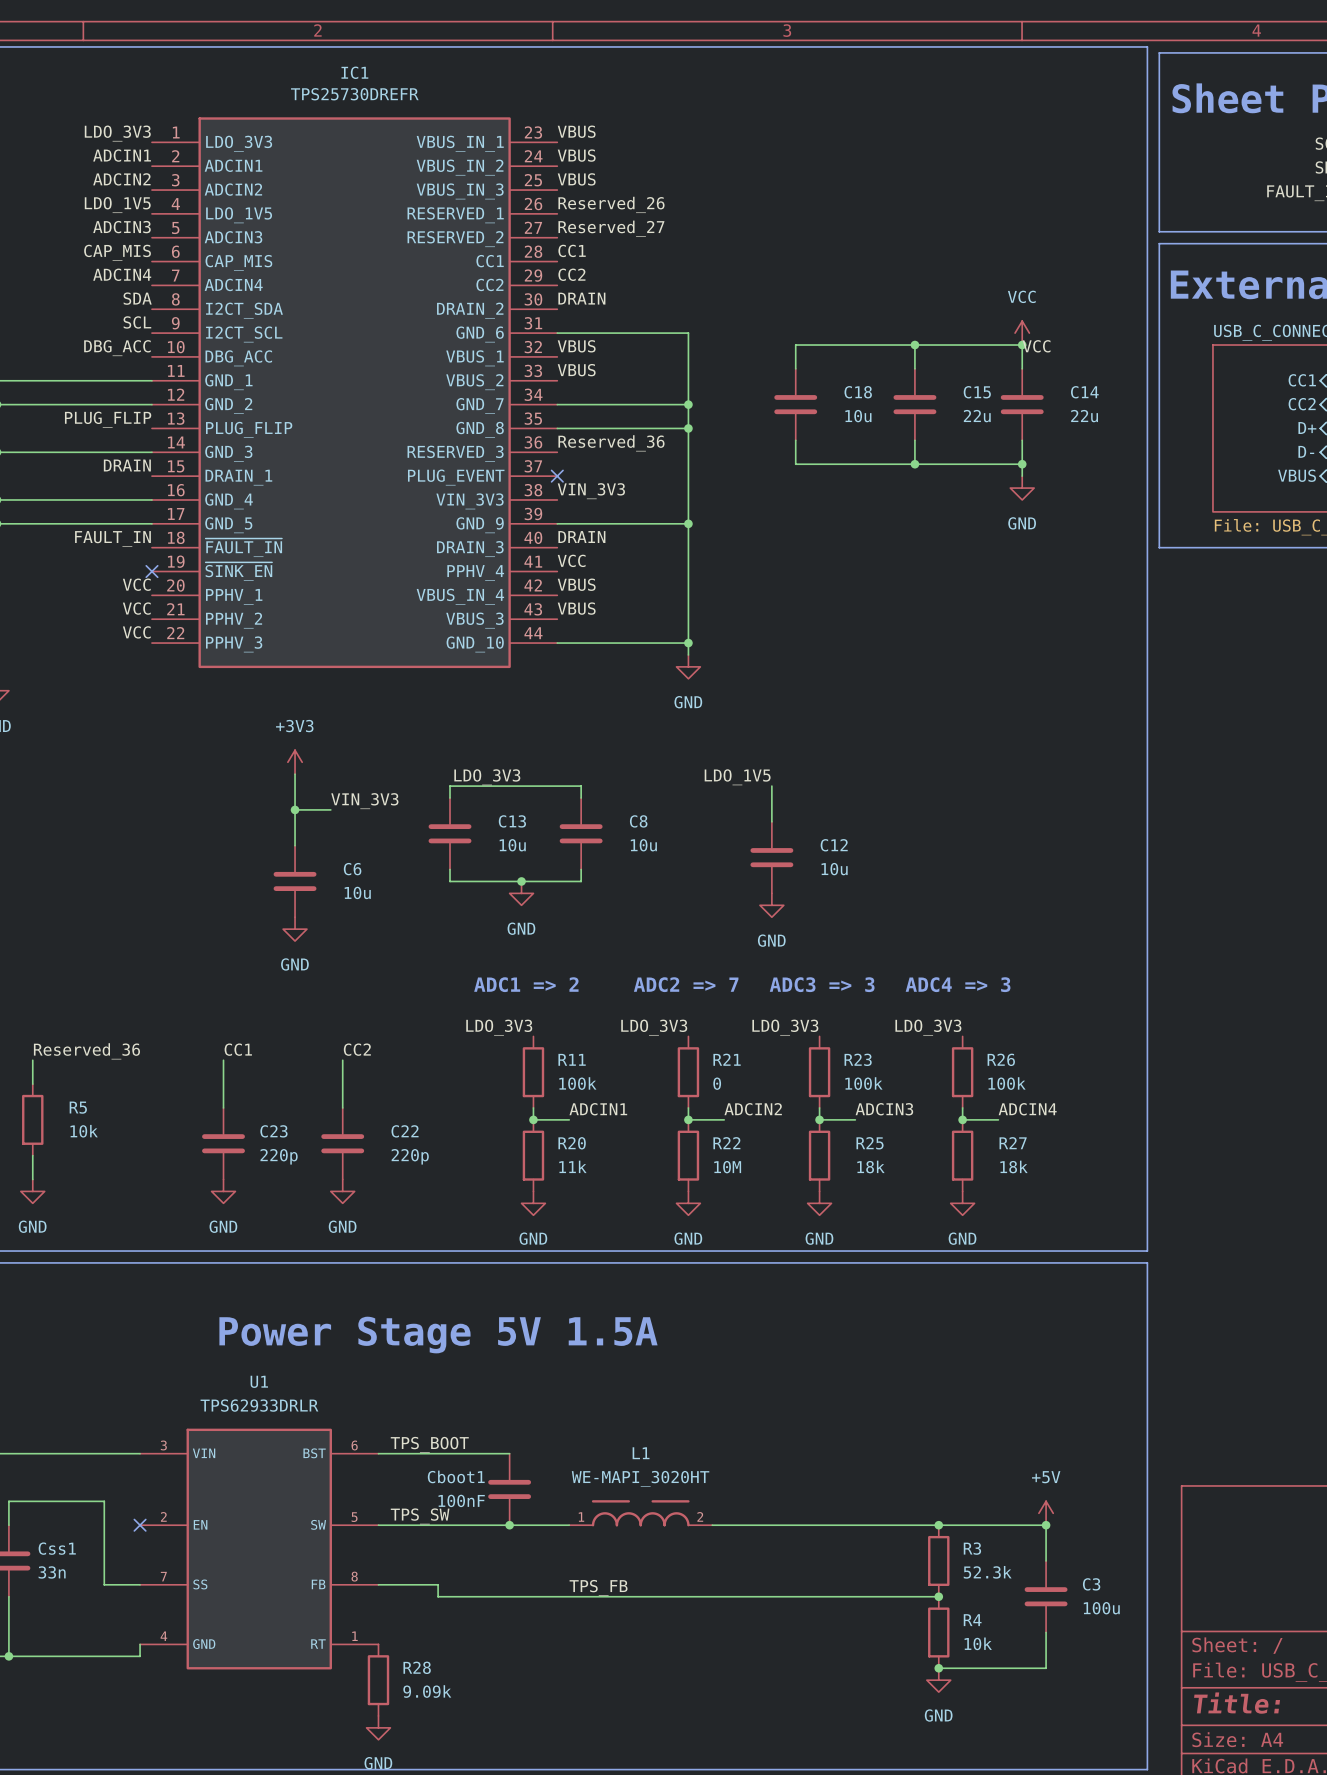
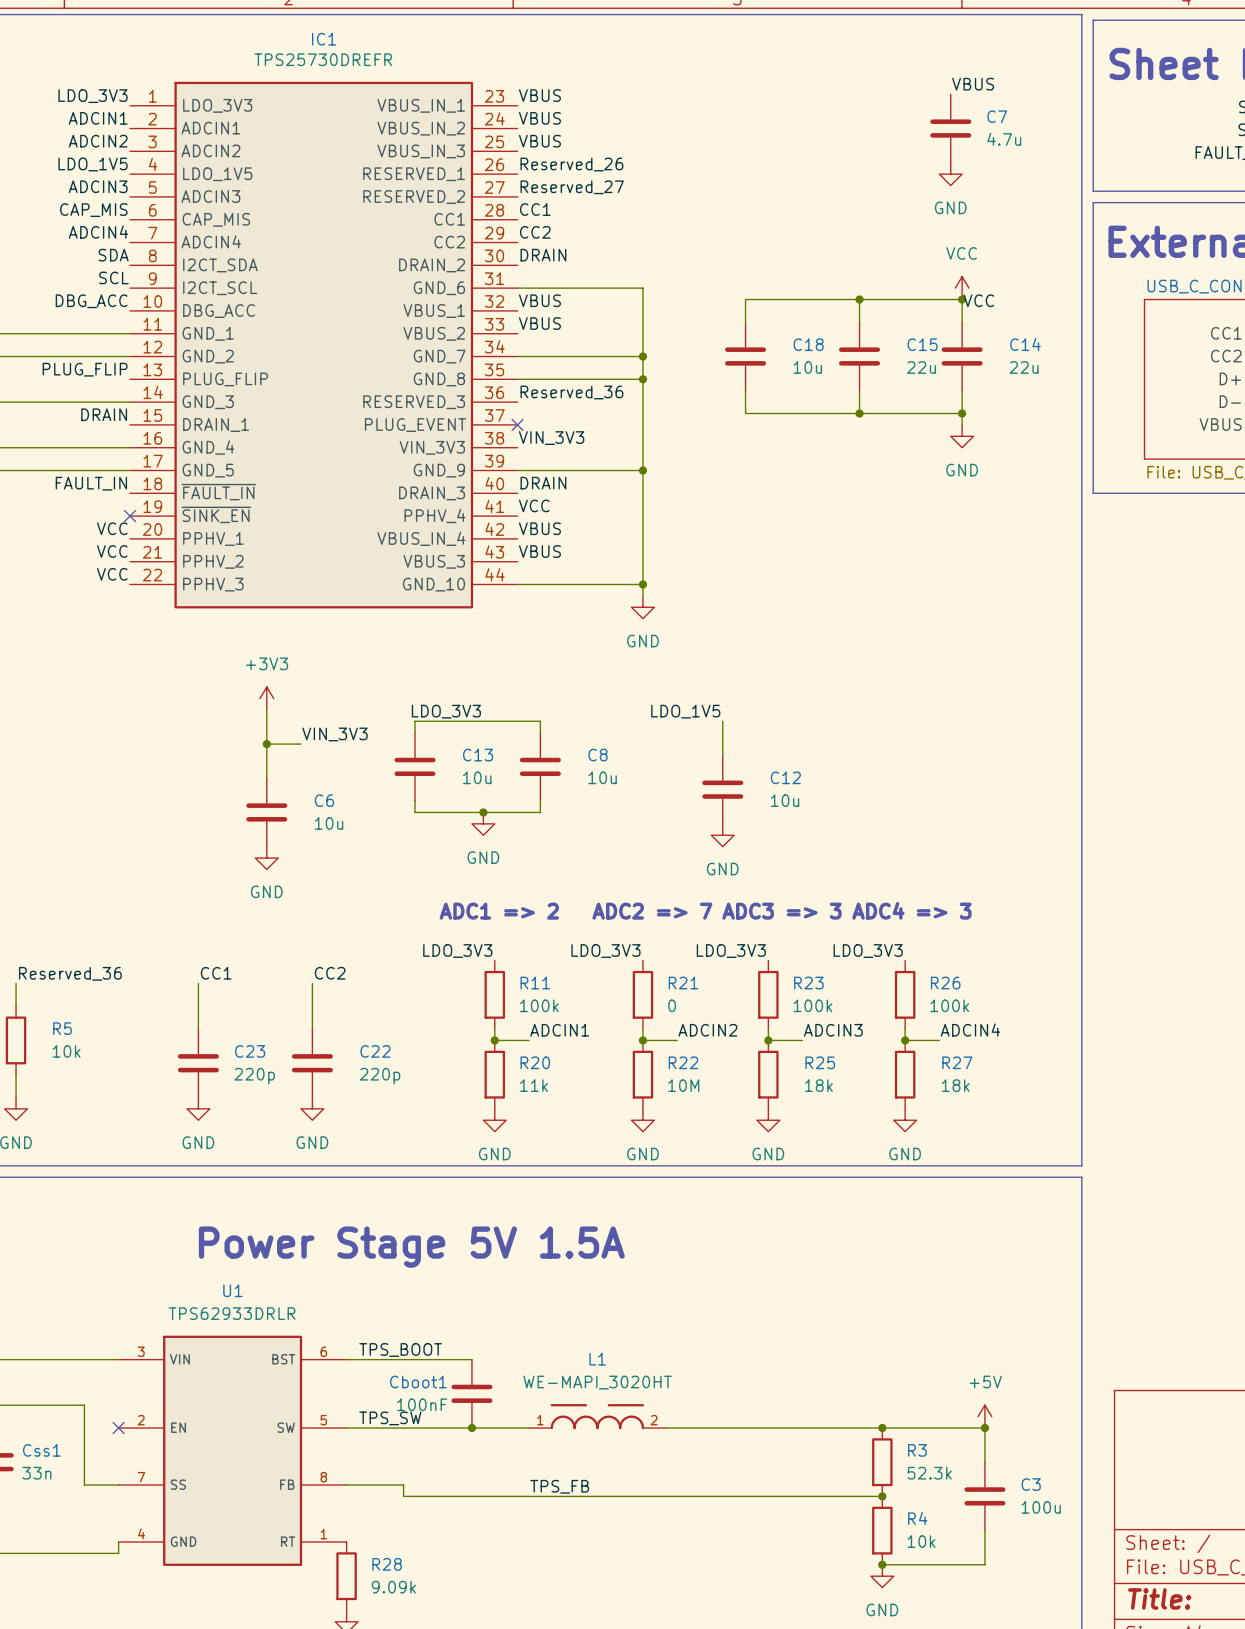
label: none -> VBUS (973, 84)
C7: none -> 4.7u (950, 128)
power symbol: none -> GND (950, 174)

